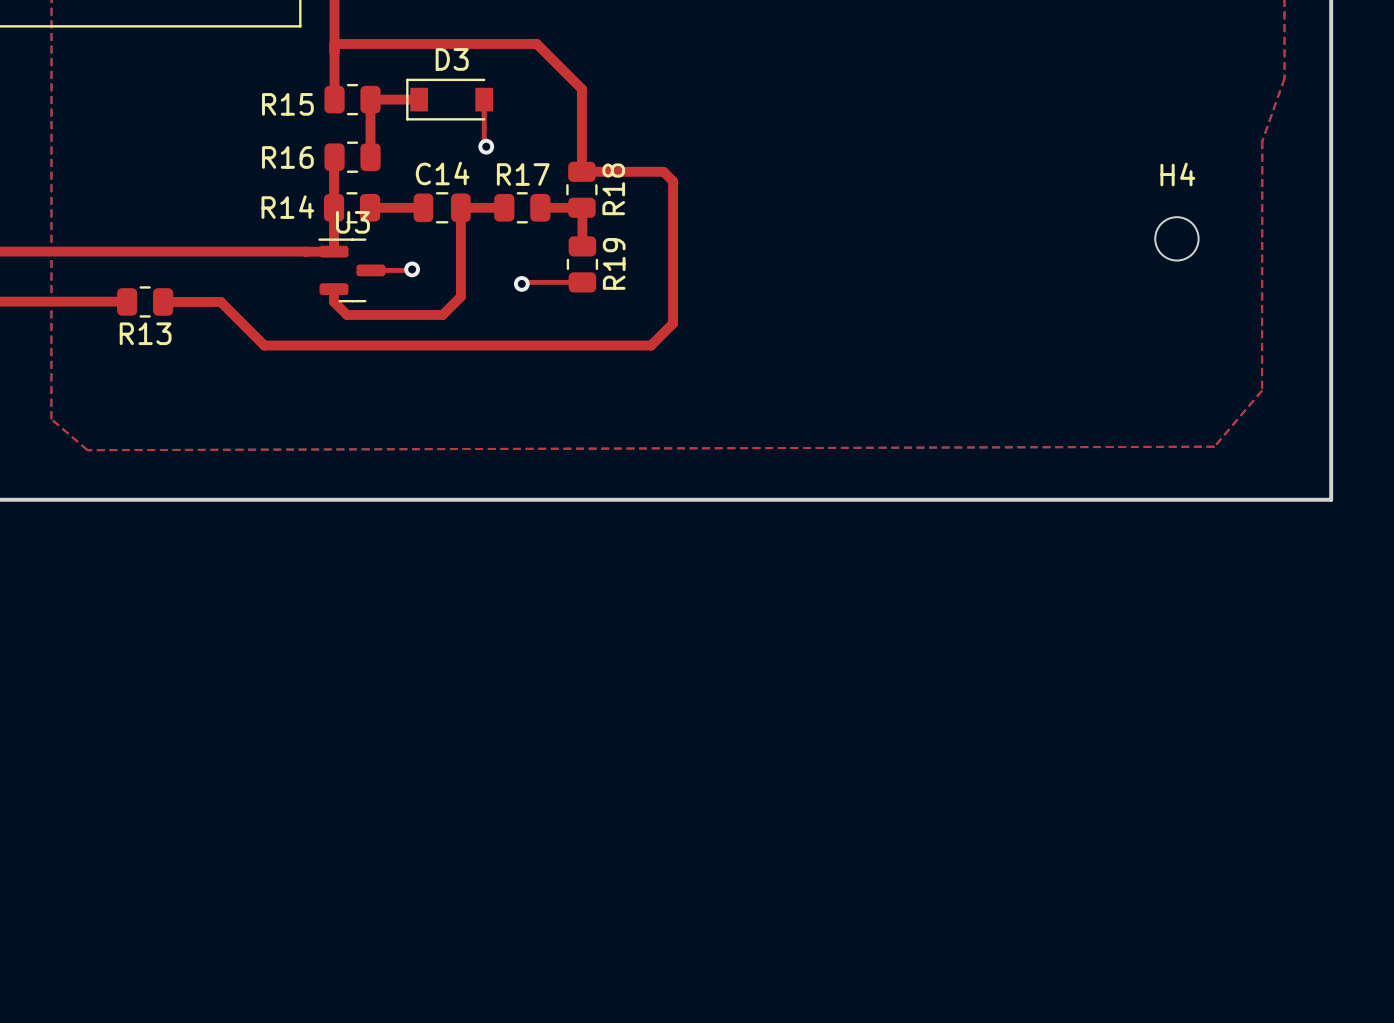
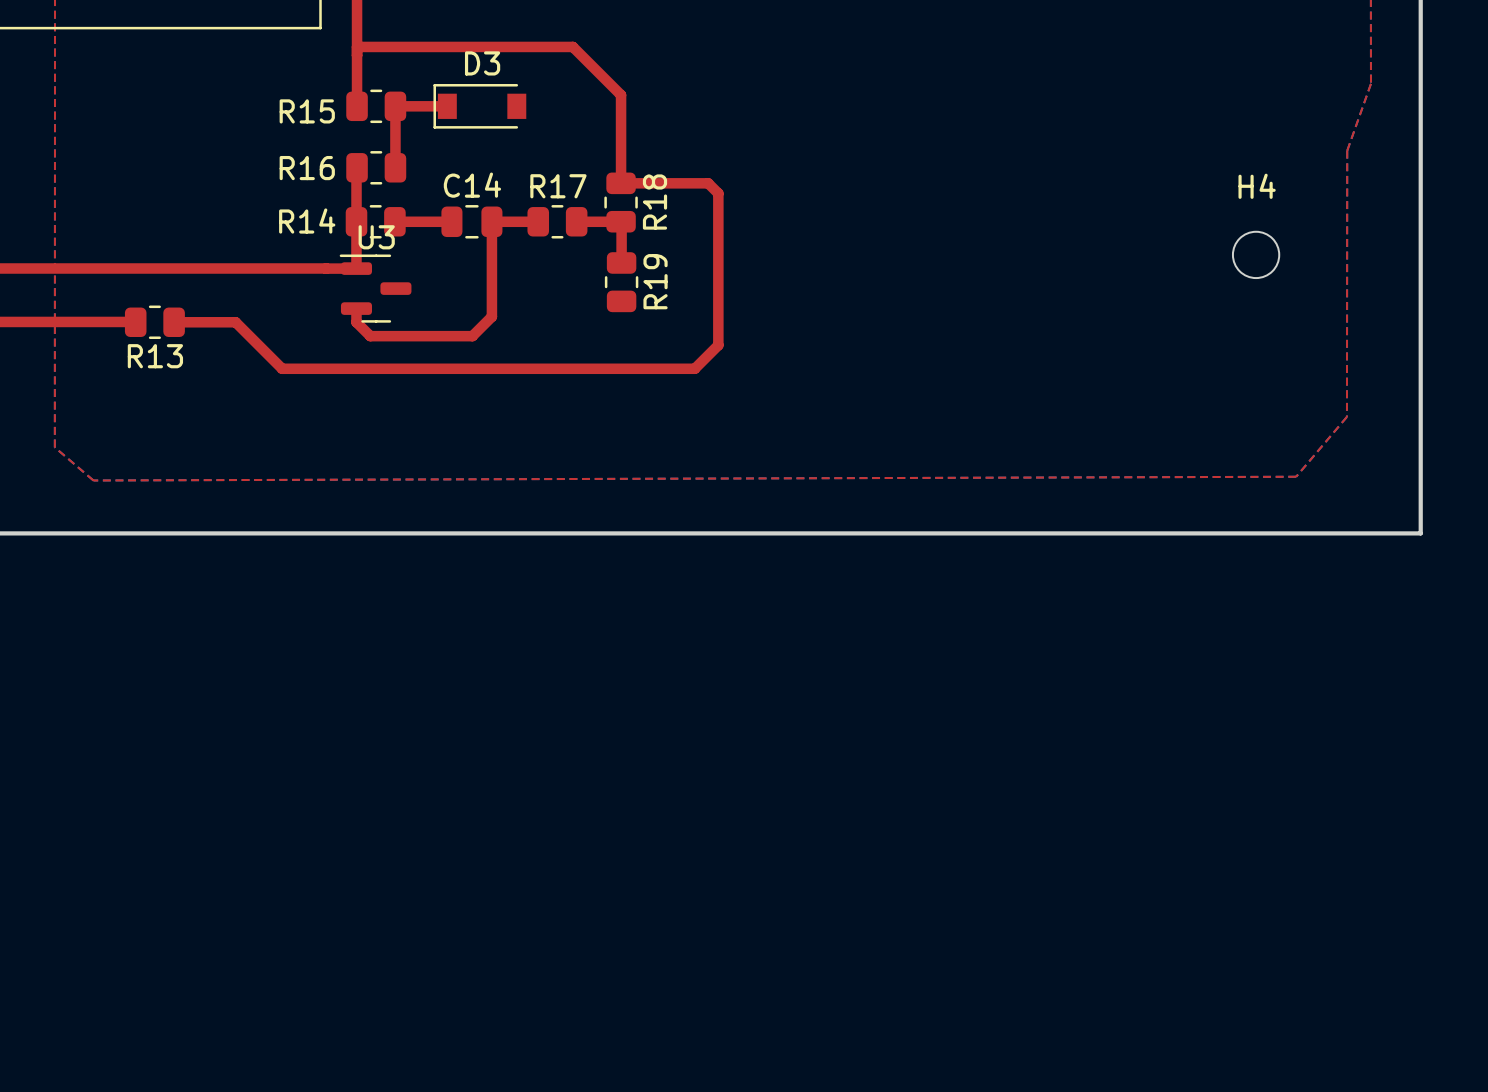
top track: (484, 99) (484, 144) (486, 146) -> none
via: (486, 146) -> none
top track: (412, 269) (370, 270) -> none
via: (412, 269) -> none
top track: (582, 282) (523, 282) (521, 283) -> none
via: (521, 283) -> none

